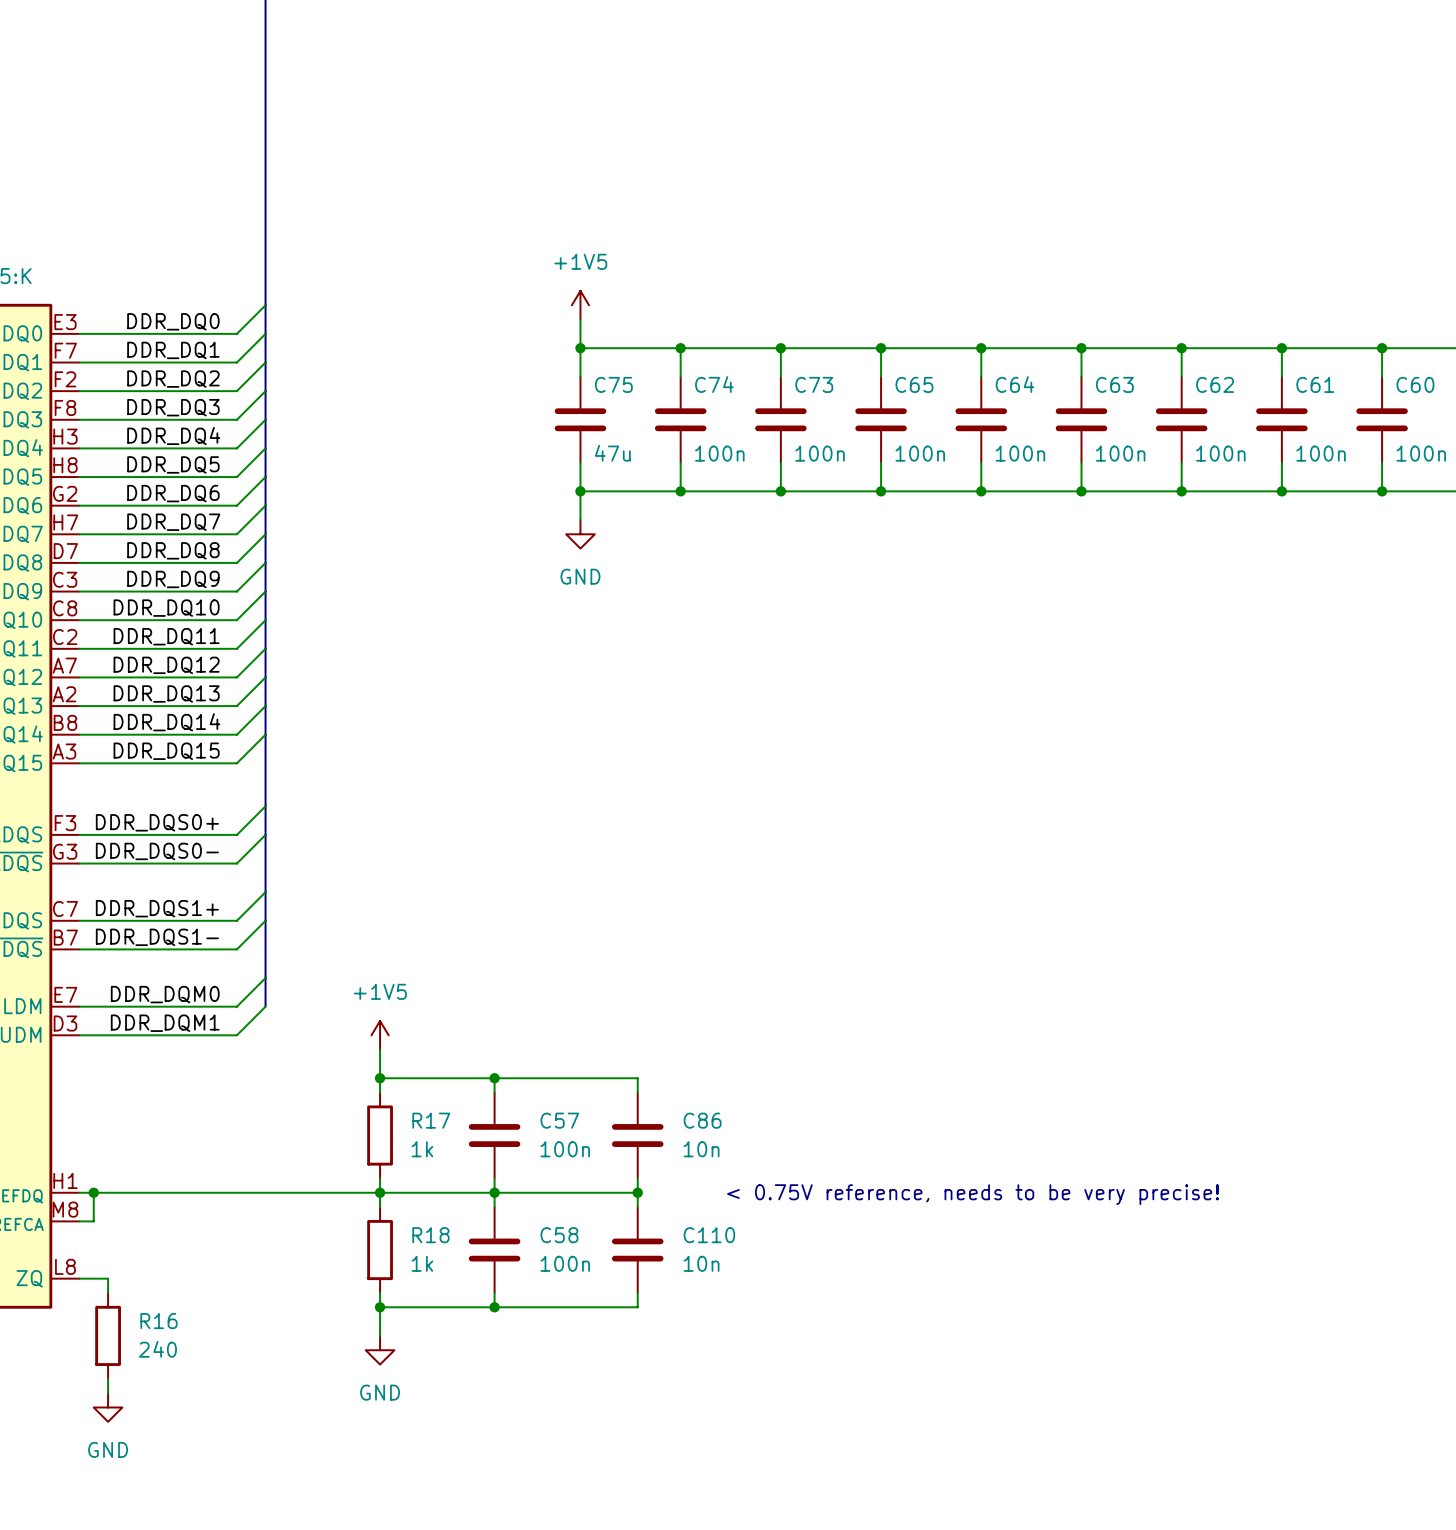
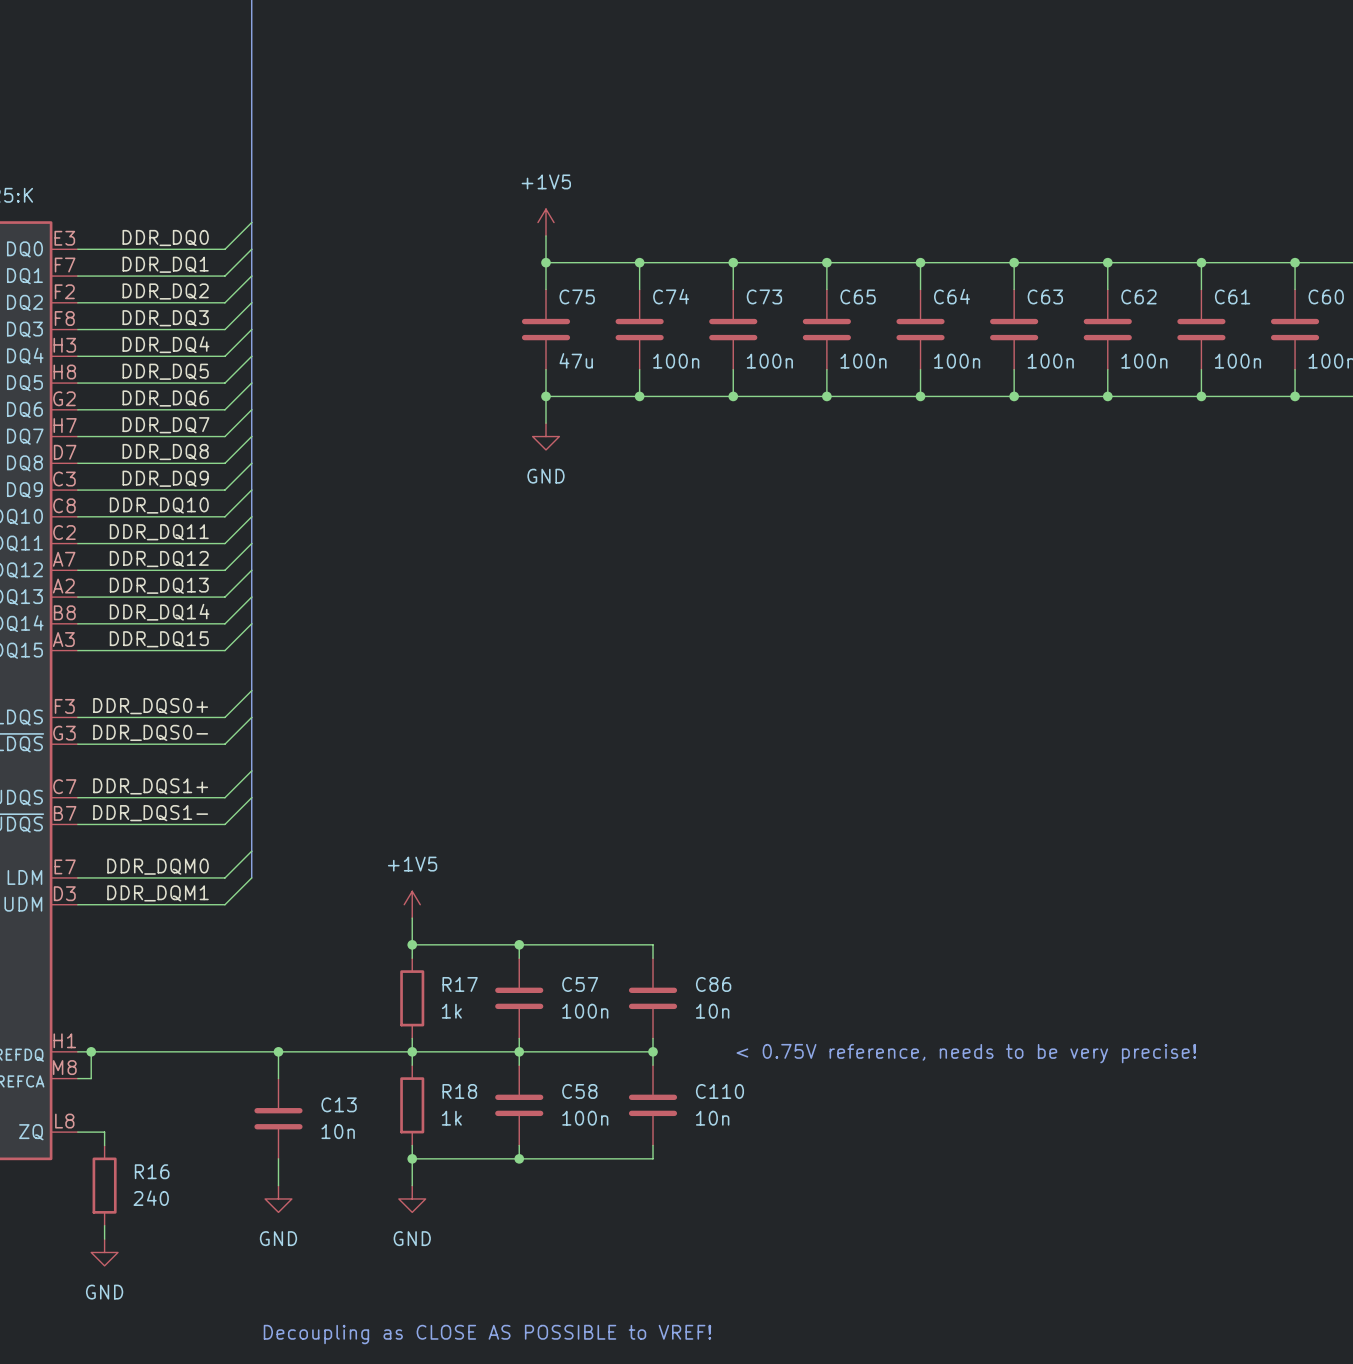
power symbol position: +1V5 (380, 1035) -> +1V5 (412, 904)
wire: (380, 1049) (380, 1092) -> (412, 918) (412, 958)
wire: (380, 1078) (437, 1078) -> none
junction: (380, 1078) -> none
junction: none -> (412, 944)
wire: (494, 1078) (494, 1092) -> (519, 944) (519, 958)
junction: (494, 1078) -> none
junction: none -> (519, 944)
wire: (637, 1078) (637, 1092) -> (599, 944) (653, 944) (653, 958)
R17 position: (380, 1135) -> (412, 998)
C57 position: (494, 1135) -> (519, 998)
C86 position: (637, 1135) -> (653, 998)
wire: (380, 1178) (380, 1207) -> (412, 1038) (412, 1065)
wire: (494, 1178) (494, 1207) -> (519, 1038) (519, 1065)
wire: (637, 1178) (637, 1207) -> (653, 1038) (653, 1065)
wire: none -> (278, 1051) (278, 1078)
junction: none -> (278, 1051)
junction: (380, 1192) -> none
junction: none -> (412, 1051)
junction: (494, 1192) -> none
junction: none -> (519, 1051)
wire: none -> (599, 1051) (653, 1051)
junction: (637, 1192) -> none
junction: none -> (653, 1051)
text position: < 0.75V reference, needs to be very precise! (973, 1194) -> < 0.75V reference, needs to be very precise! (966, 1053)
R18 position: (380, 1250) -> (412, 1105)
C58 position: (494, 1250) -> (519, 1105)
C110 position: (637, 1250) -> (653, 1105)
C13: none -> 10n (278, 1118)
wire: (380, 1292) (380, 1335) -> (412, 1145) (412, 1185)
wire: (494, 1292) (494, 1307) -> (519, 1145) (519, 1158)
wire: (637, 1292) (637, 1307) -> (653, 1145) (653, 1158) (599, 1158)
wire: none -> (278, 1158) (278, 1185)
wire: (380, 1307) (437, 1307) -> none
junction: (380, 1307) -> none
junction: none -> (412, 1158)
junction: (494, 1307) -> none
junction: none -> (519, 1158)
power symbol: none -> GND (278, 1198)
power symbol: GND (380, 1350) -> none
power symbol: none -> GND (412, 1198)
text: none -> Decoupling as CLOSE AS POSSIBLE to VREF! (487, 1334)

